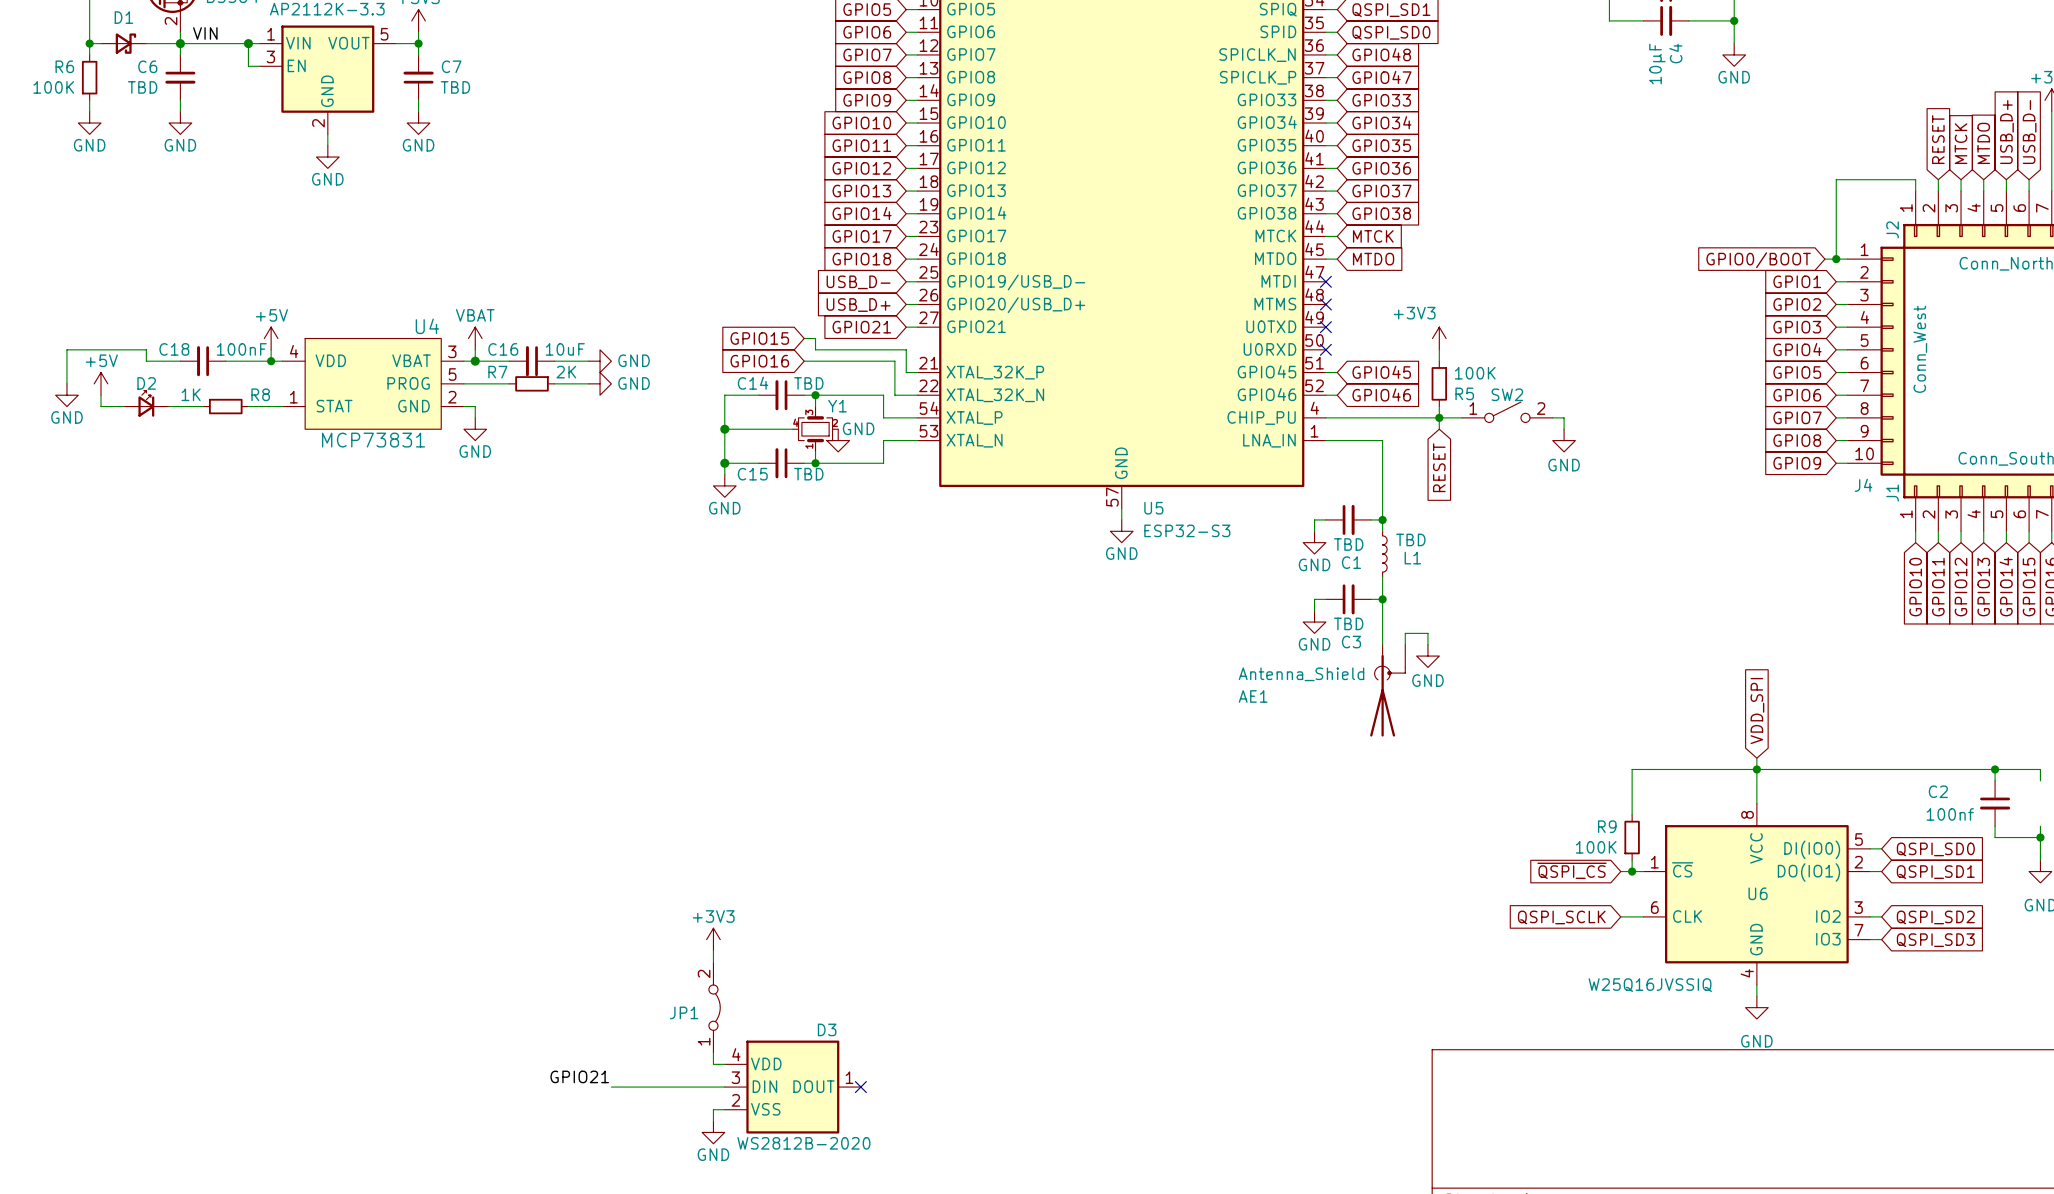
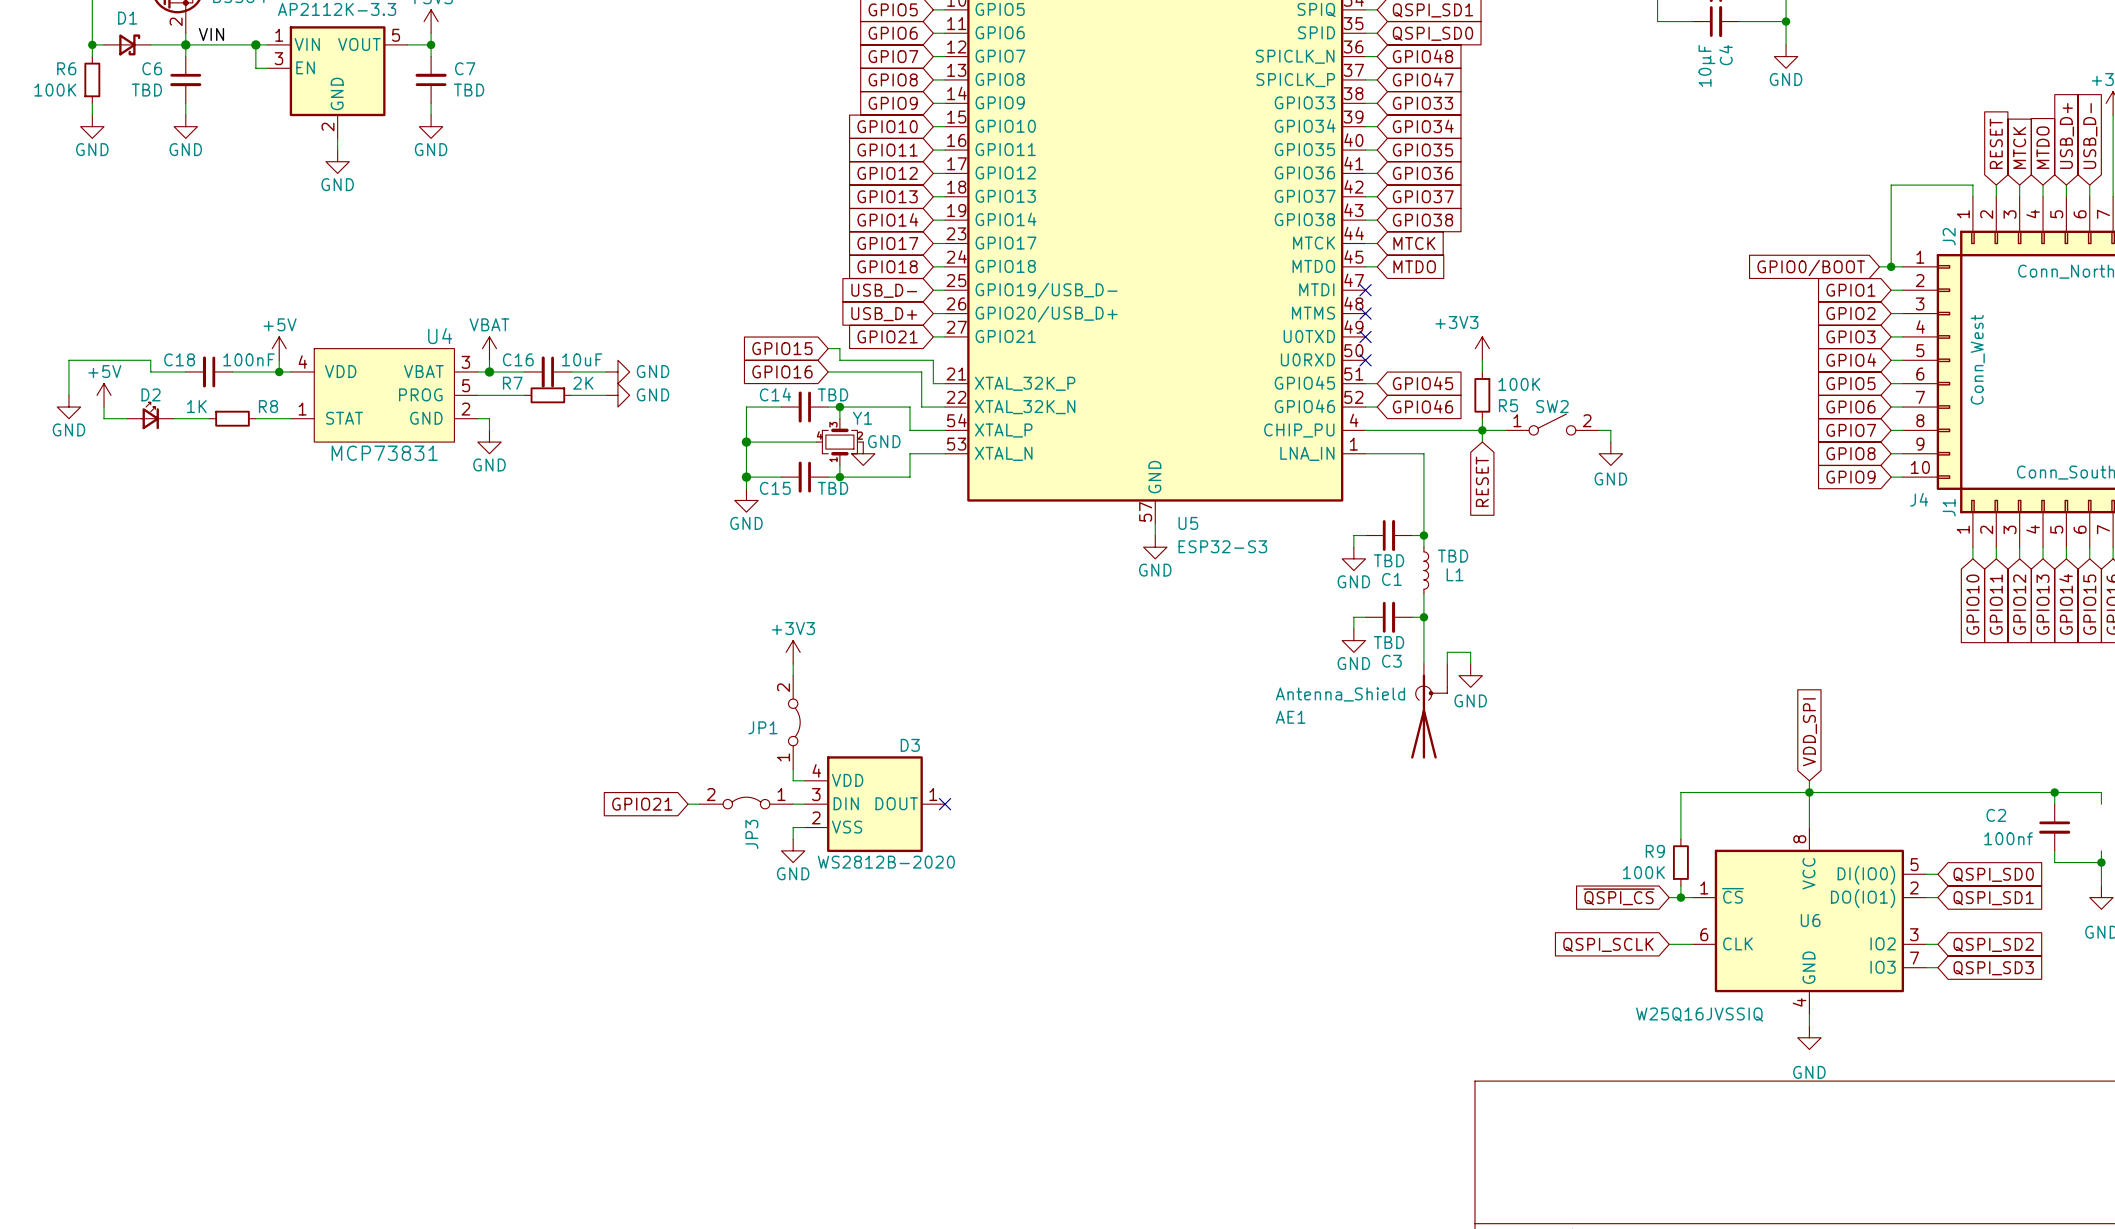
power symbol: none -> +3V3 (793, 652)
wire: none -> (793, 664) (793, 675)
wire: none -> (793, 769) (793, 780) (804, 780)
JP3: none -> (746, 803)
global label: none -> GPIO21 (642, 804)
wire: none -> (688, 804) (699, 804)
wire: none -> (793, 804) (804, 804)
no-connect mark: none -> (945, 804)
wire: none -> (804, 827) (793, 827) (793, 839)
power symbol: none -> GND (793, 850)
power symbol: +3V3 (713, 939) -> none
wire: (713, 950) (713, 962) -> none
JP1 position: (714, 1007) -> (794, 722)
wire: (713, 1053) (713, 1064) (724, 1064) -> none
label: GPIO21 (579, 1076) -> none
wire: (611, 1087) (724, 1087) -> none
D3 position: (792, 1087) -> (874, 804)
no-connect mark: (860, 1087) -> none
wire: (724, 1109) (713, 1109) (713, 1121) -> none
power symbol: GND (713, 1132) -> none

